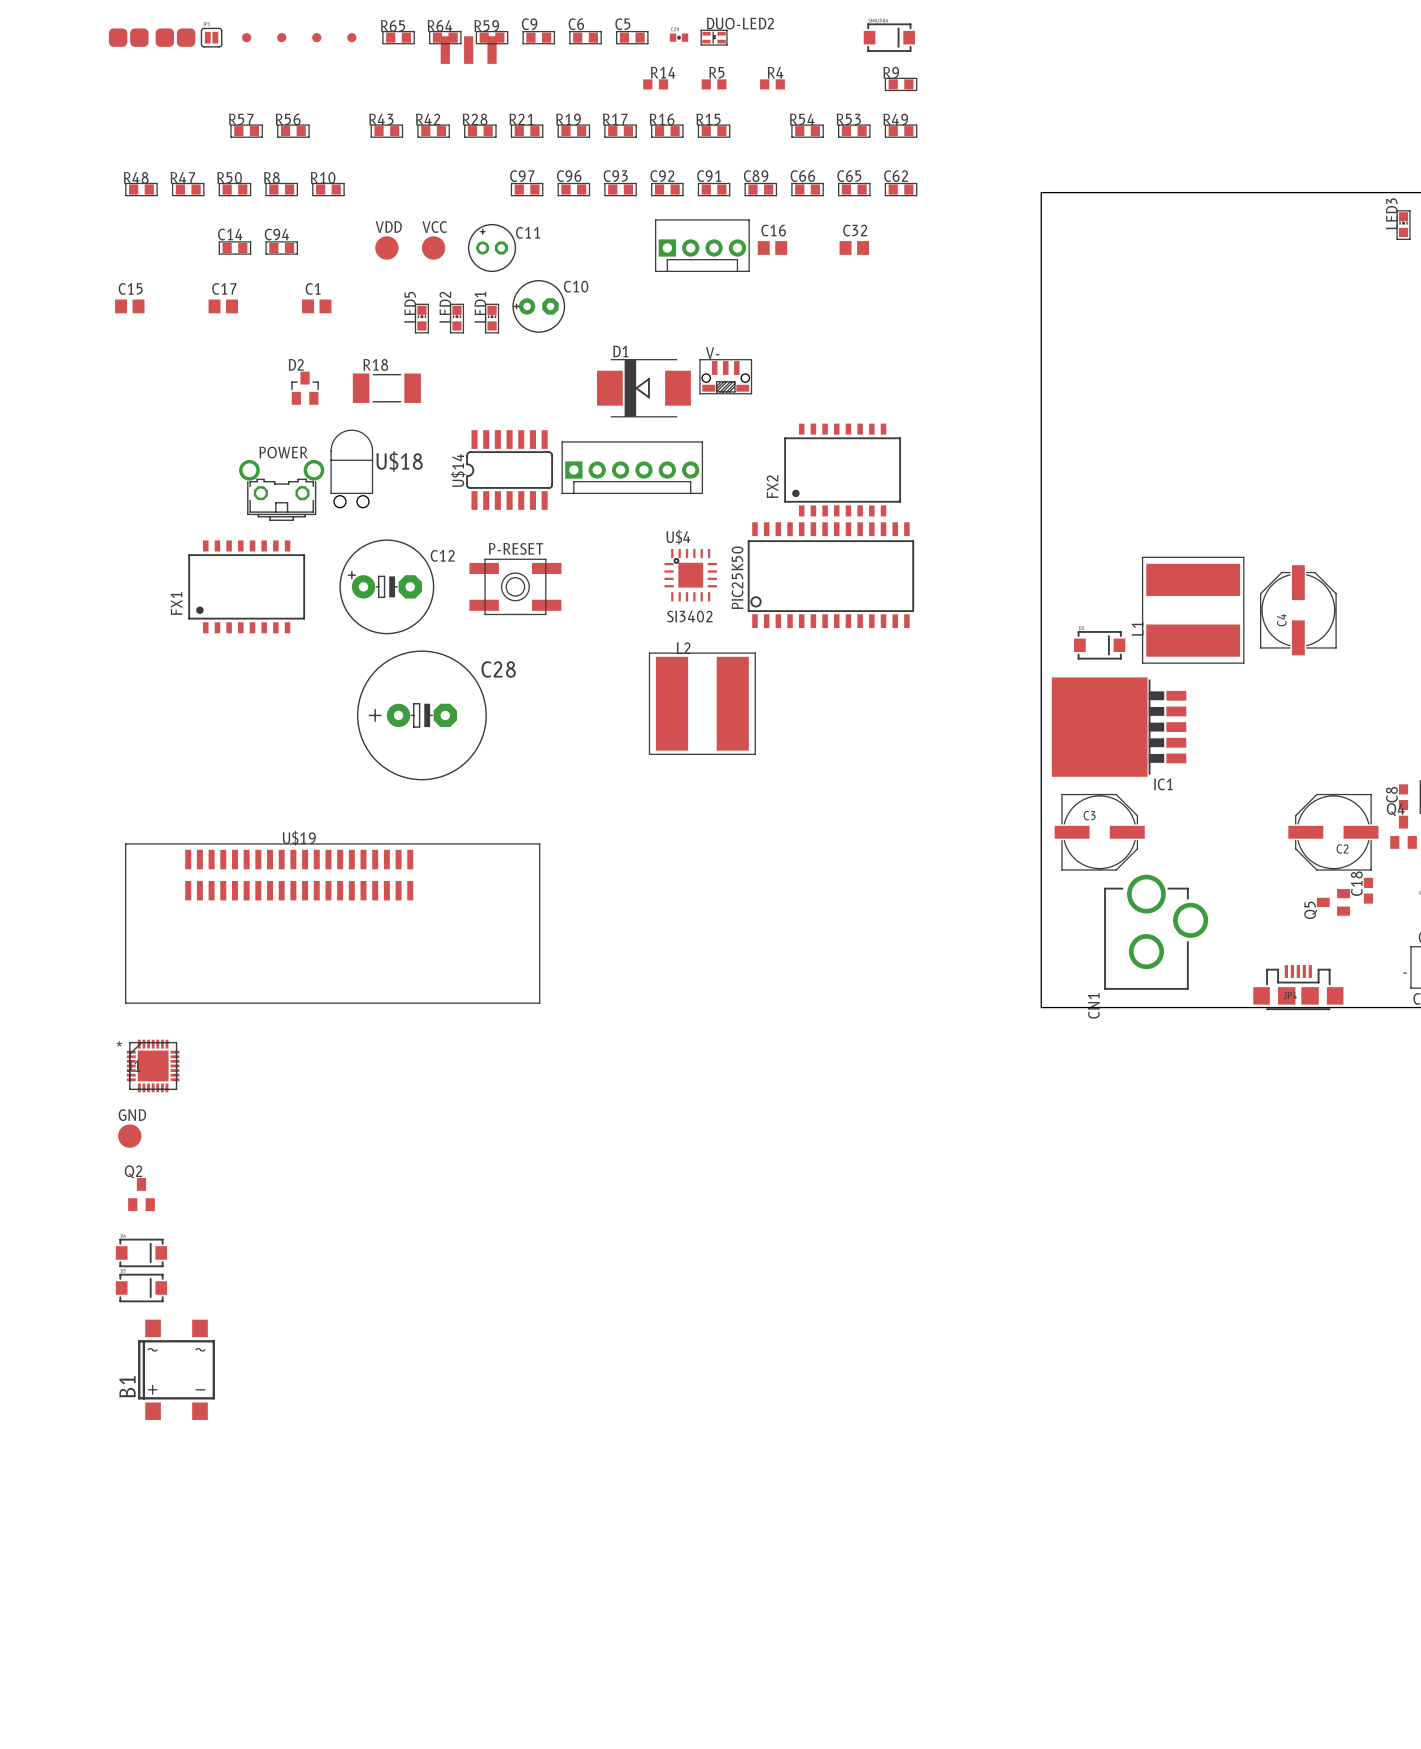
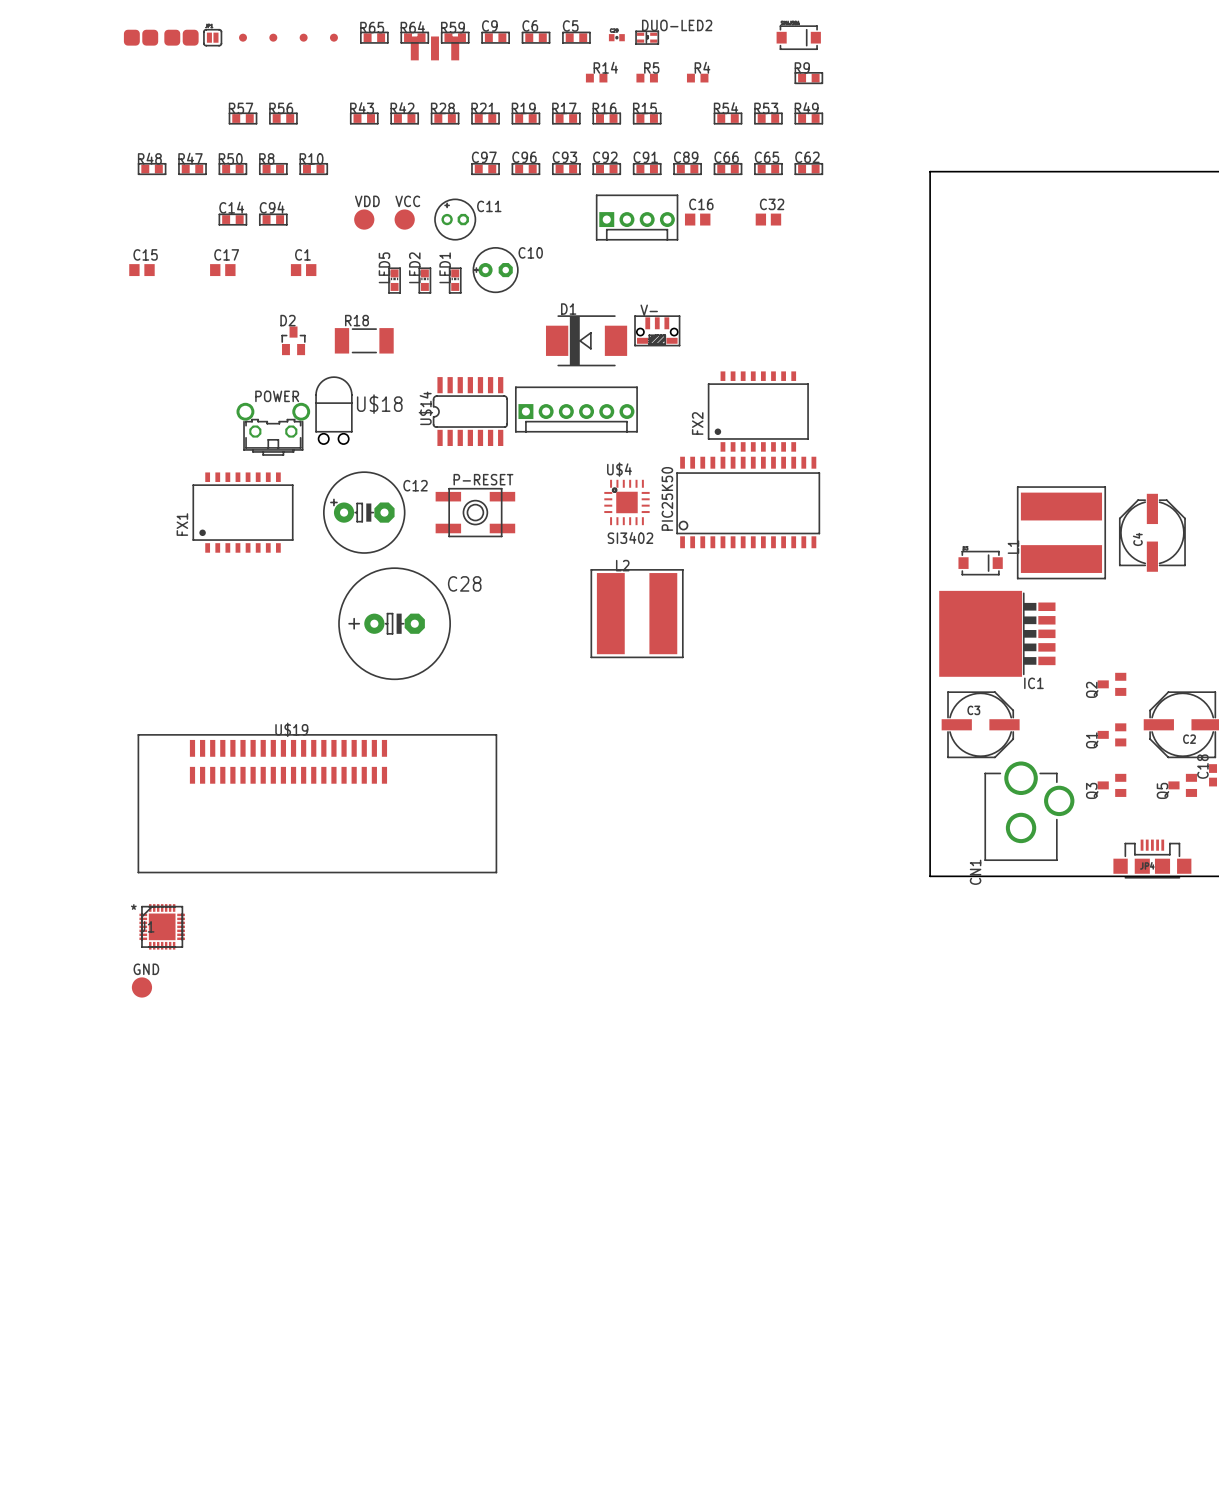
Q1: none -> (1111, 734)
Q3: none -> (1111, 785)
Q2 rotation: 0° (141, 1194) -> 90° counterclockwise (1111, 684)
Q2 position: (141, 1194) -> (1111, 684)
part: (141, 1252) -> none
part: (141, 1288) -> none
B1: (176, 1369) -> none

